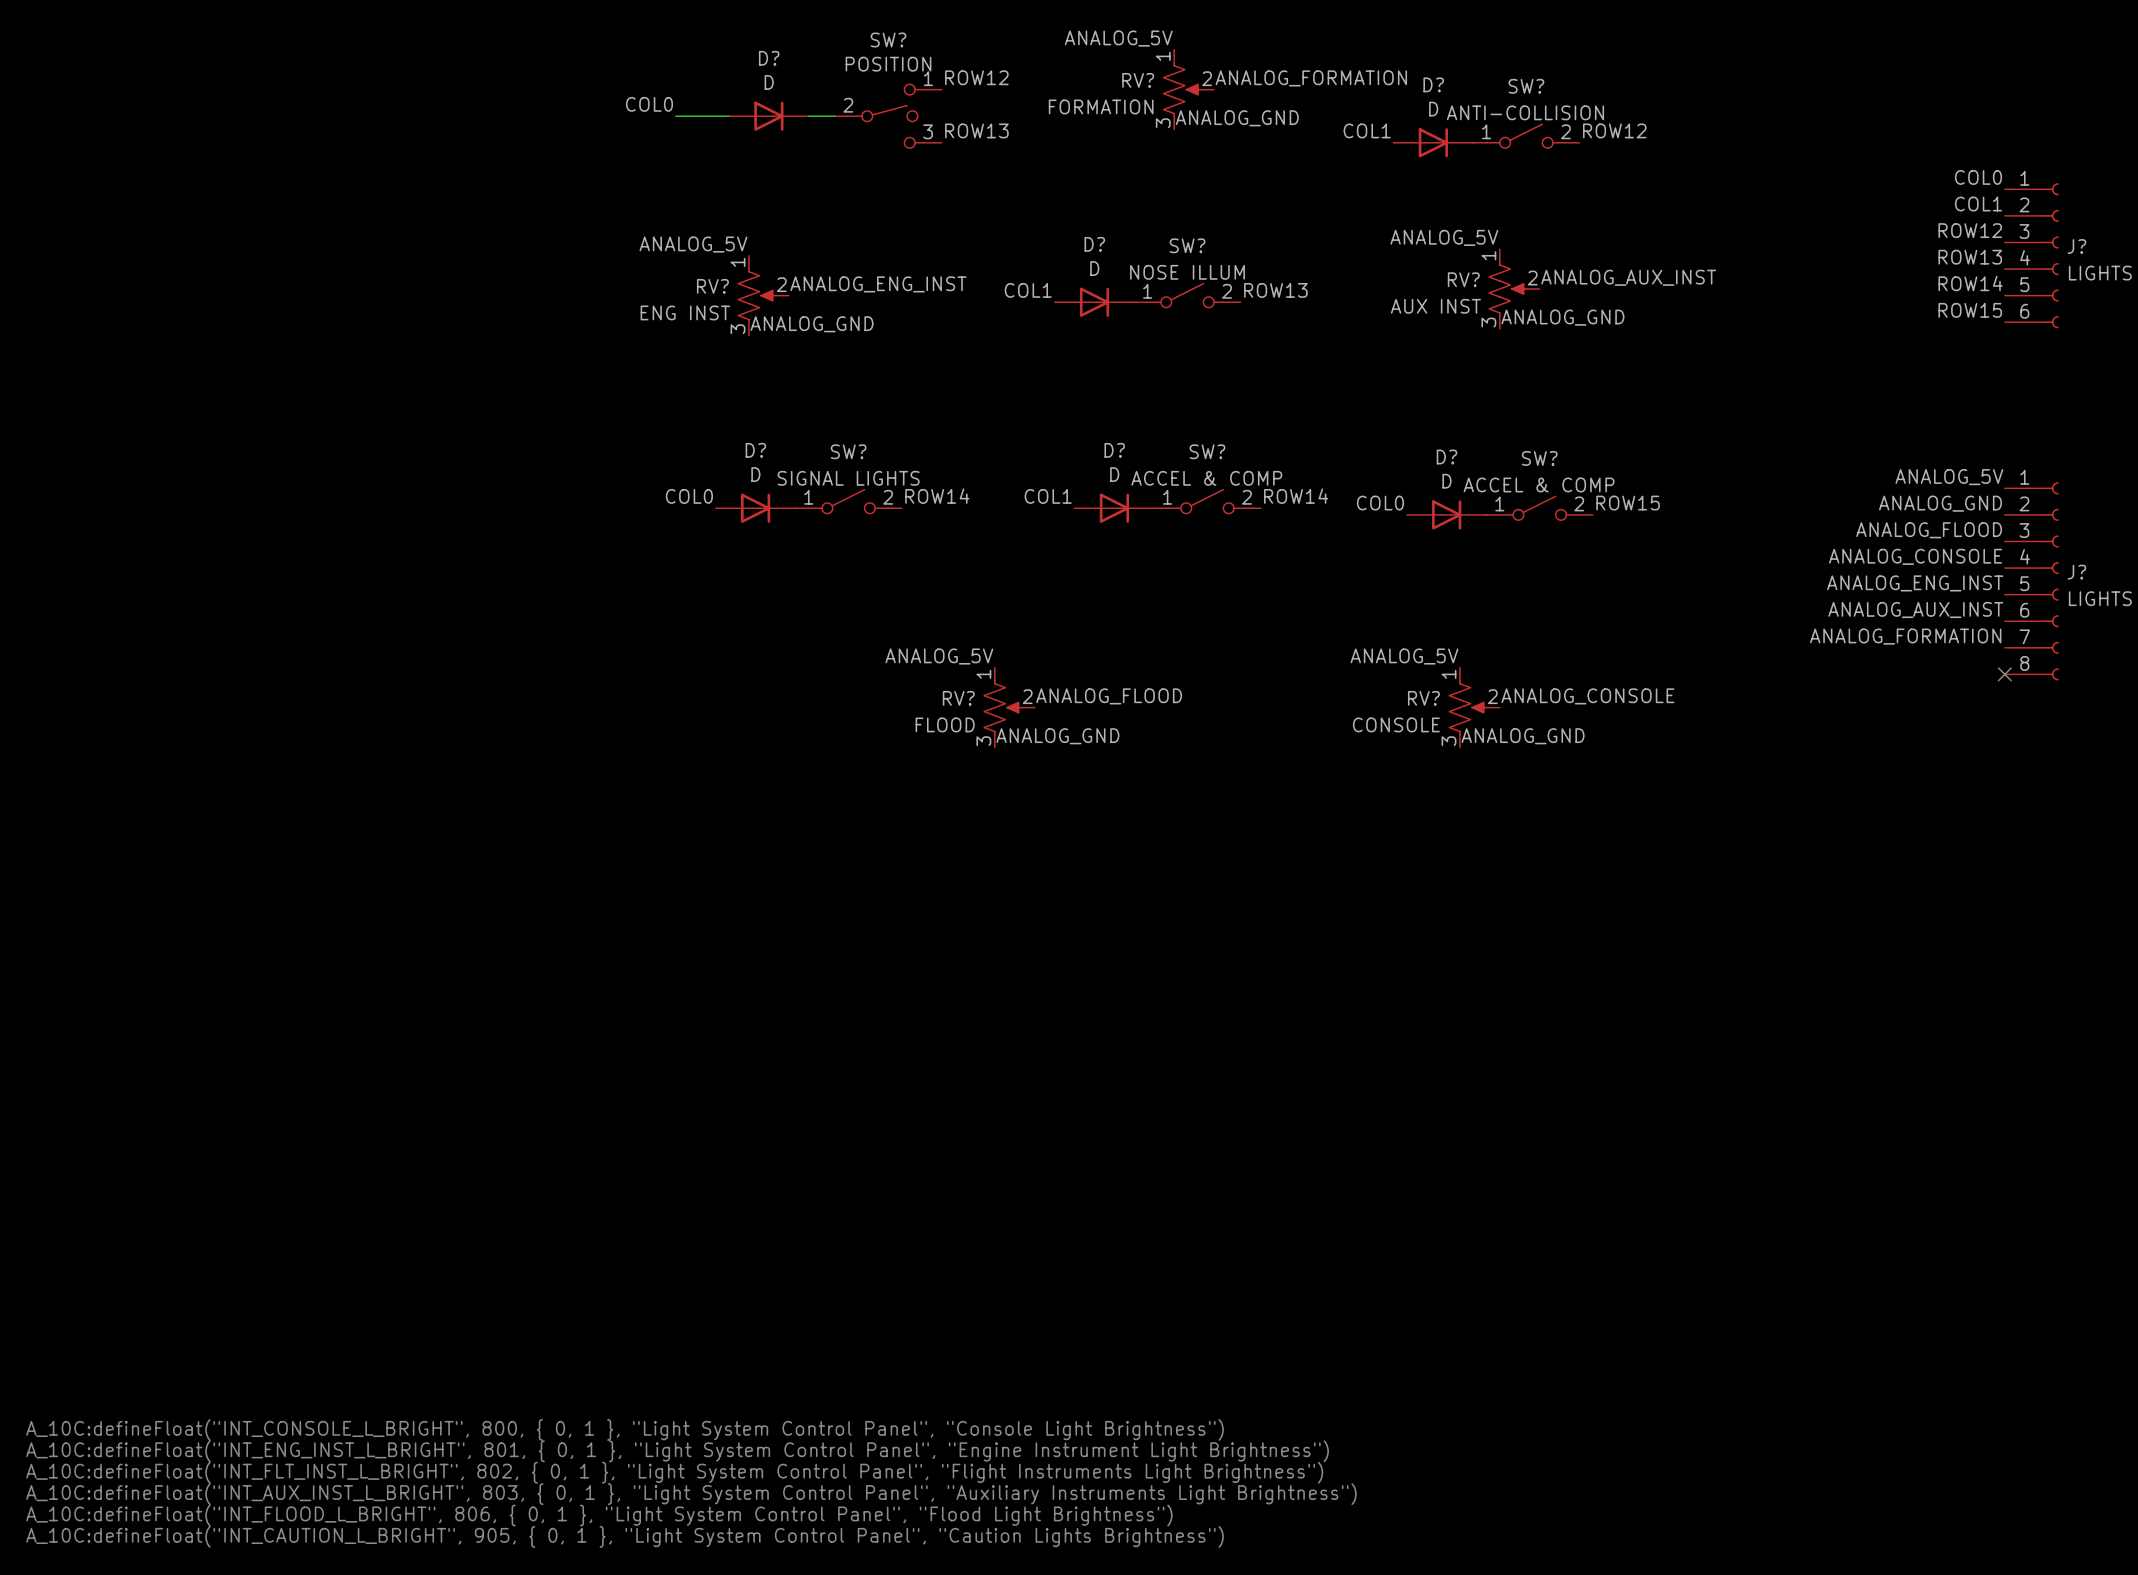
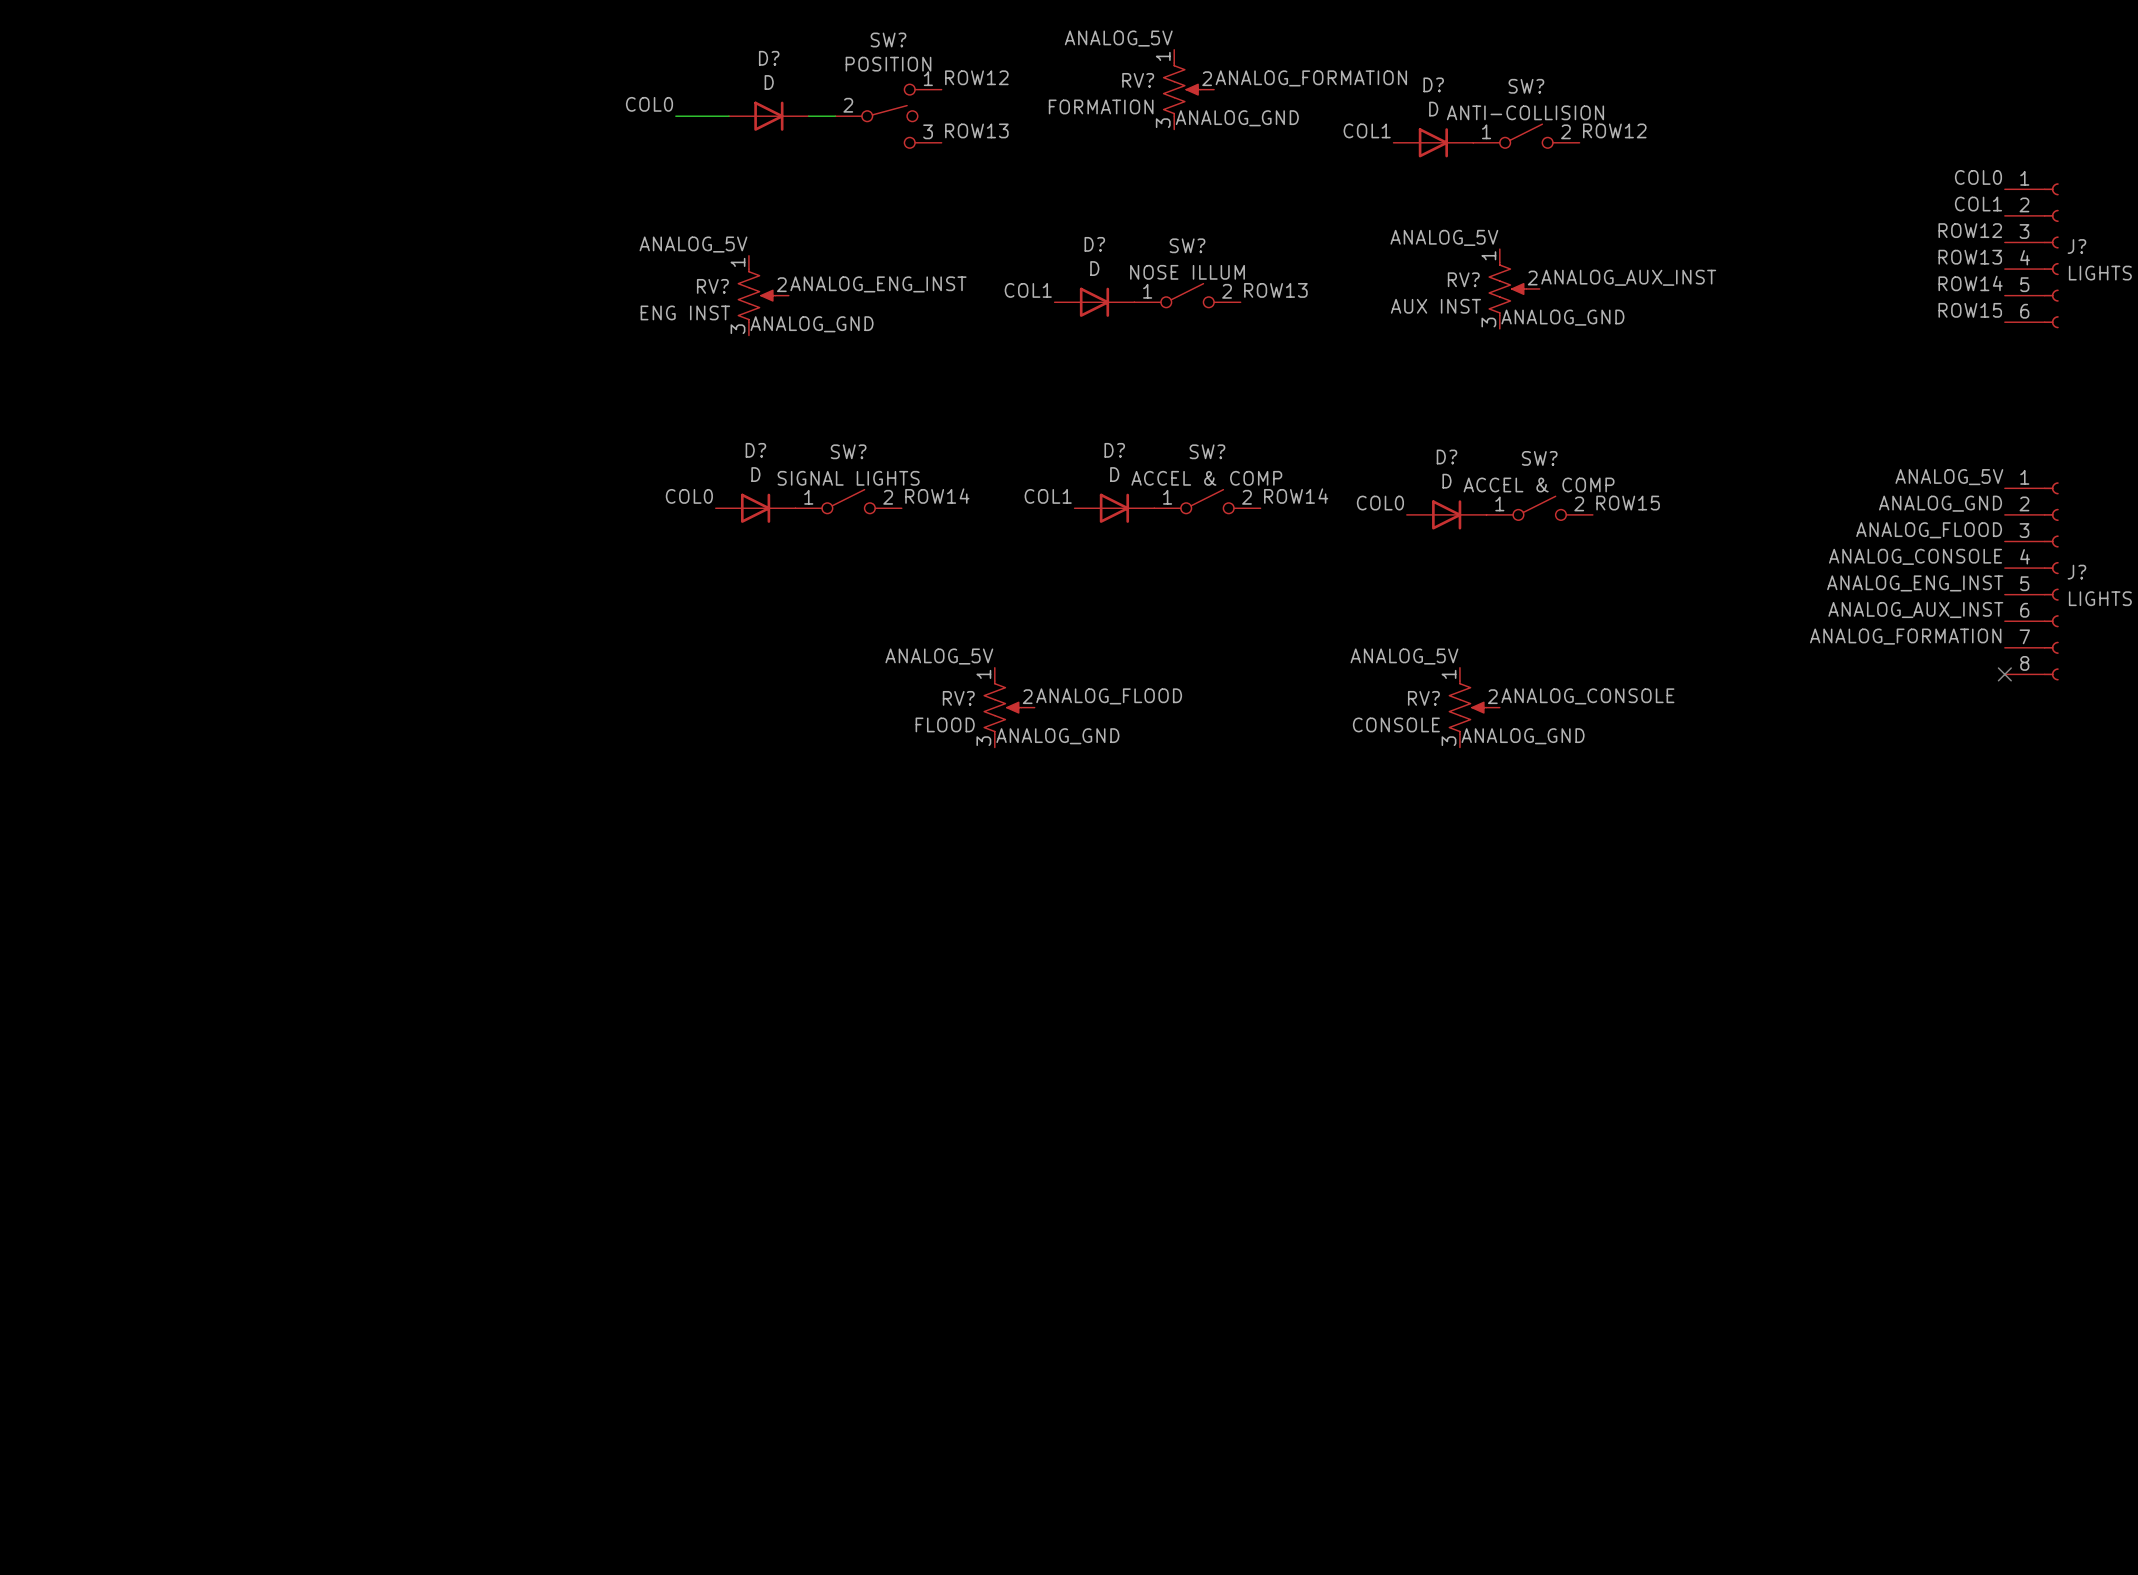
text: A_10C:defineFloat("INT_CONSOLE_L_BRIGHT", 800, { 0, 1 }, "Light System Control Panel", "Console Light Brightness") (625, 1429) -> none
text: A_10C:defineFloat("INT_ENG_INST_L_BRIGHT", 801, { 0, 1 }, "Light System Control Panel", "Engine Instrument Light Brightness") (677, 1451) -> none
text: A_10C:defineFloat("INT_FLT_INST_L_BRIGHT", 802, { 0, 1 }, "Light System Control Panel", "Flight Instruments Light Brightness") (674, 1472) -> none
text: A_10C:defineFloat("INT_AUX_INST_L_BRIGHT", 803, { 0, 1 }, "Light System Control Panel", "Auxiliary Instruments Light Brightness") (691, 1494) -> none
text: A_10C:defineFloat("INT_FLOOD_L_BRIGHT", 806, { 0, 1 }, "Light System Control Panel", "Flood Light Brightness") (599, 1515) -> none
text: A_10C:defineFloat("INT_CAUTION_L_BRIGHT", 905, { 0, 1 }, "Light System Control Panel", "Caution Lights Brightness") (625, 1536) -> none

